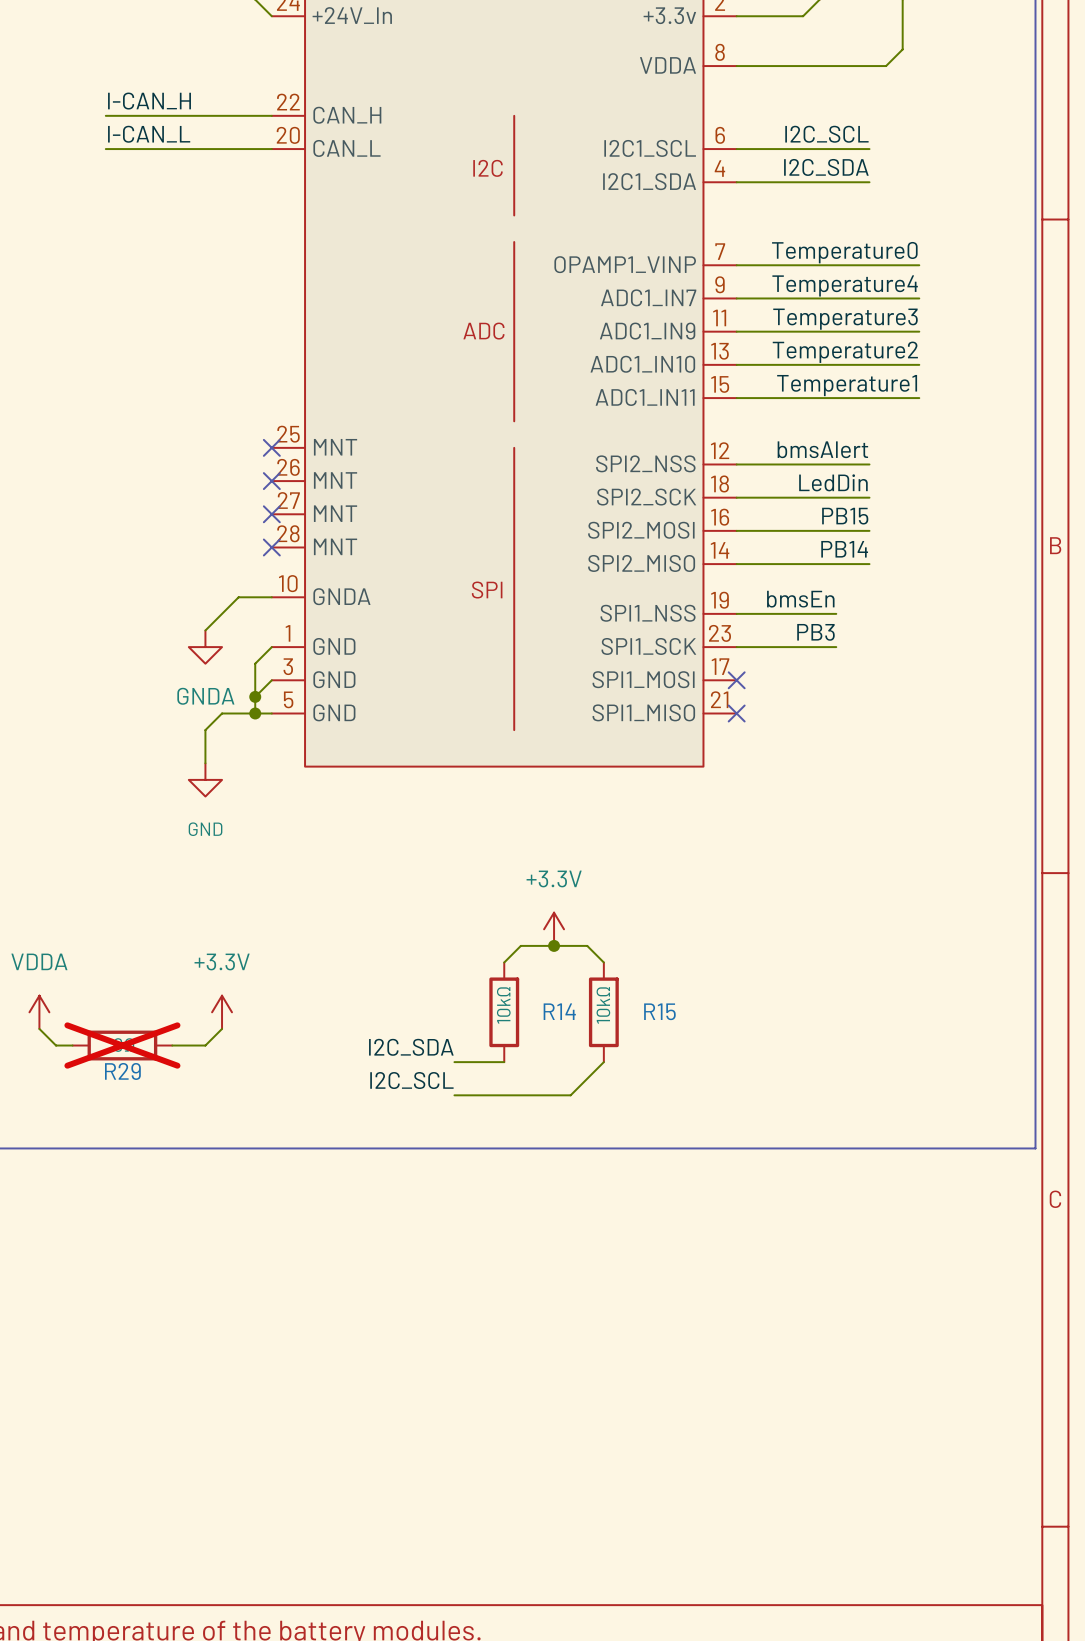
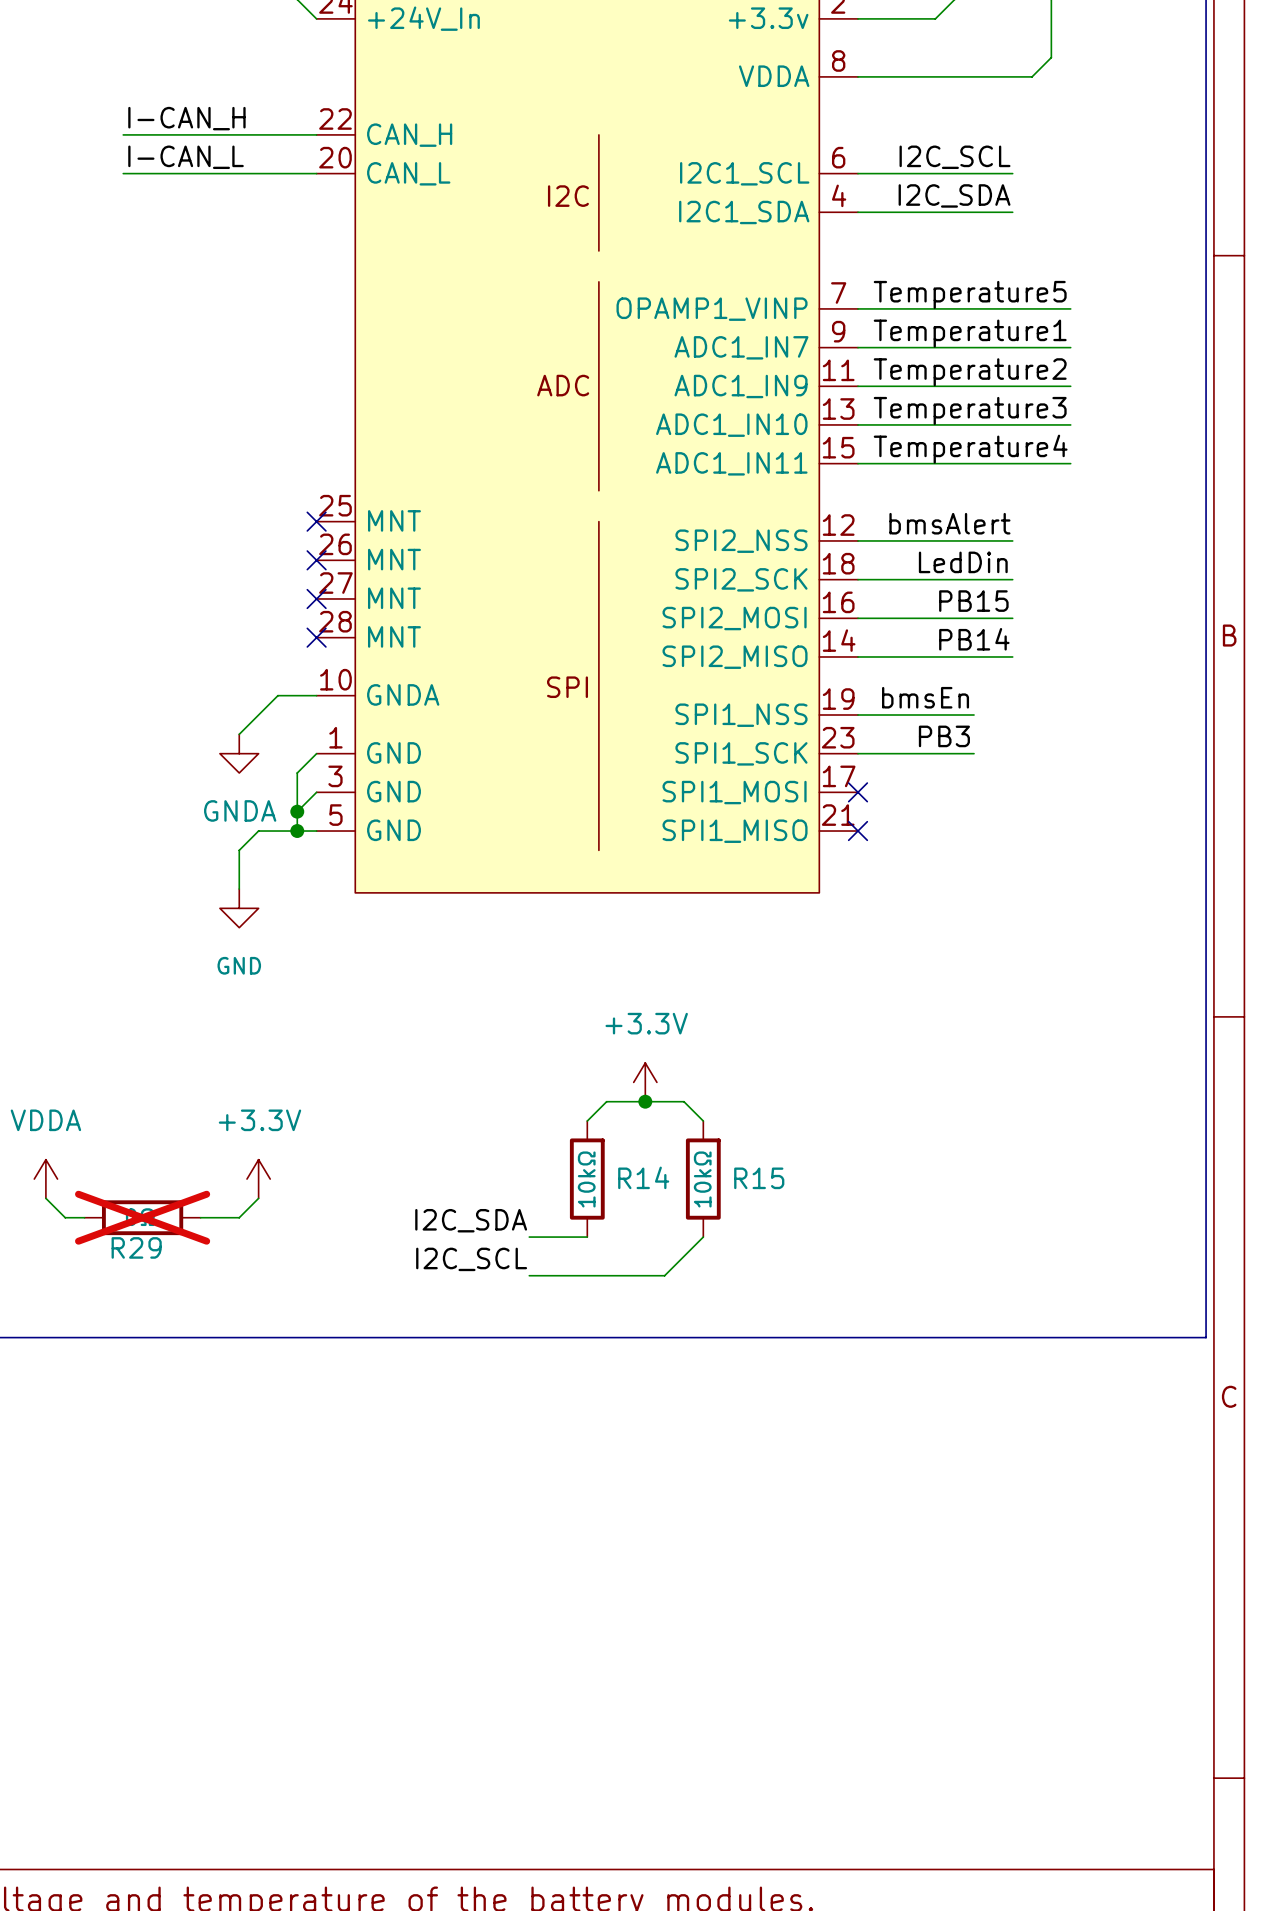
label: Temperature0 (844, 252) -> Temperature5 (970, 294)
label: Temperature4 (845, 285) -> Temperature1 (970, 333)
label: Temperature3 (845, 319) -> Temperature2 (970, 372)
label: Temperature2 (845, 352) -> Temperature3 (970, 410)
label: Temperature1 (847, 385) -> Temperature4 (970, 449)

